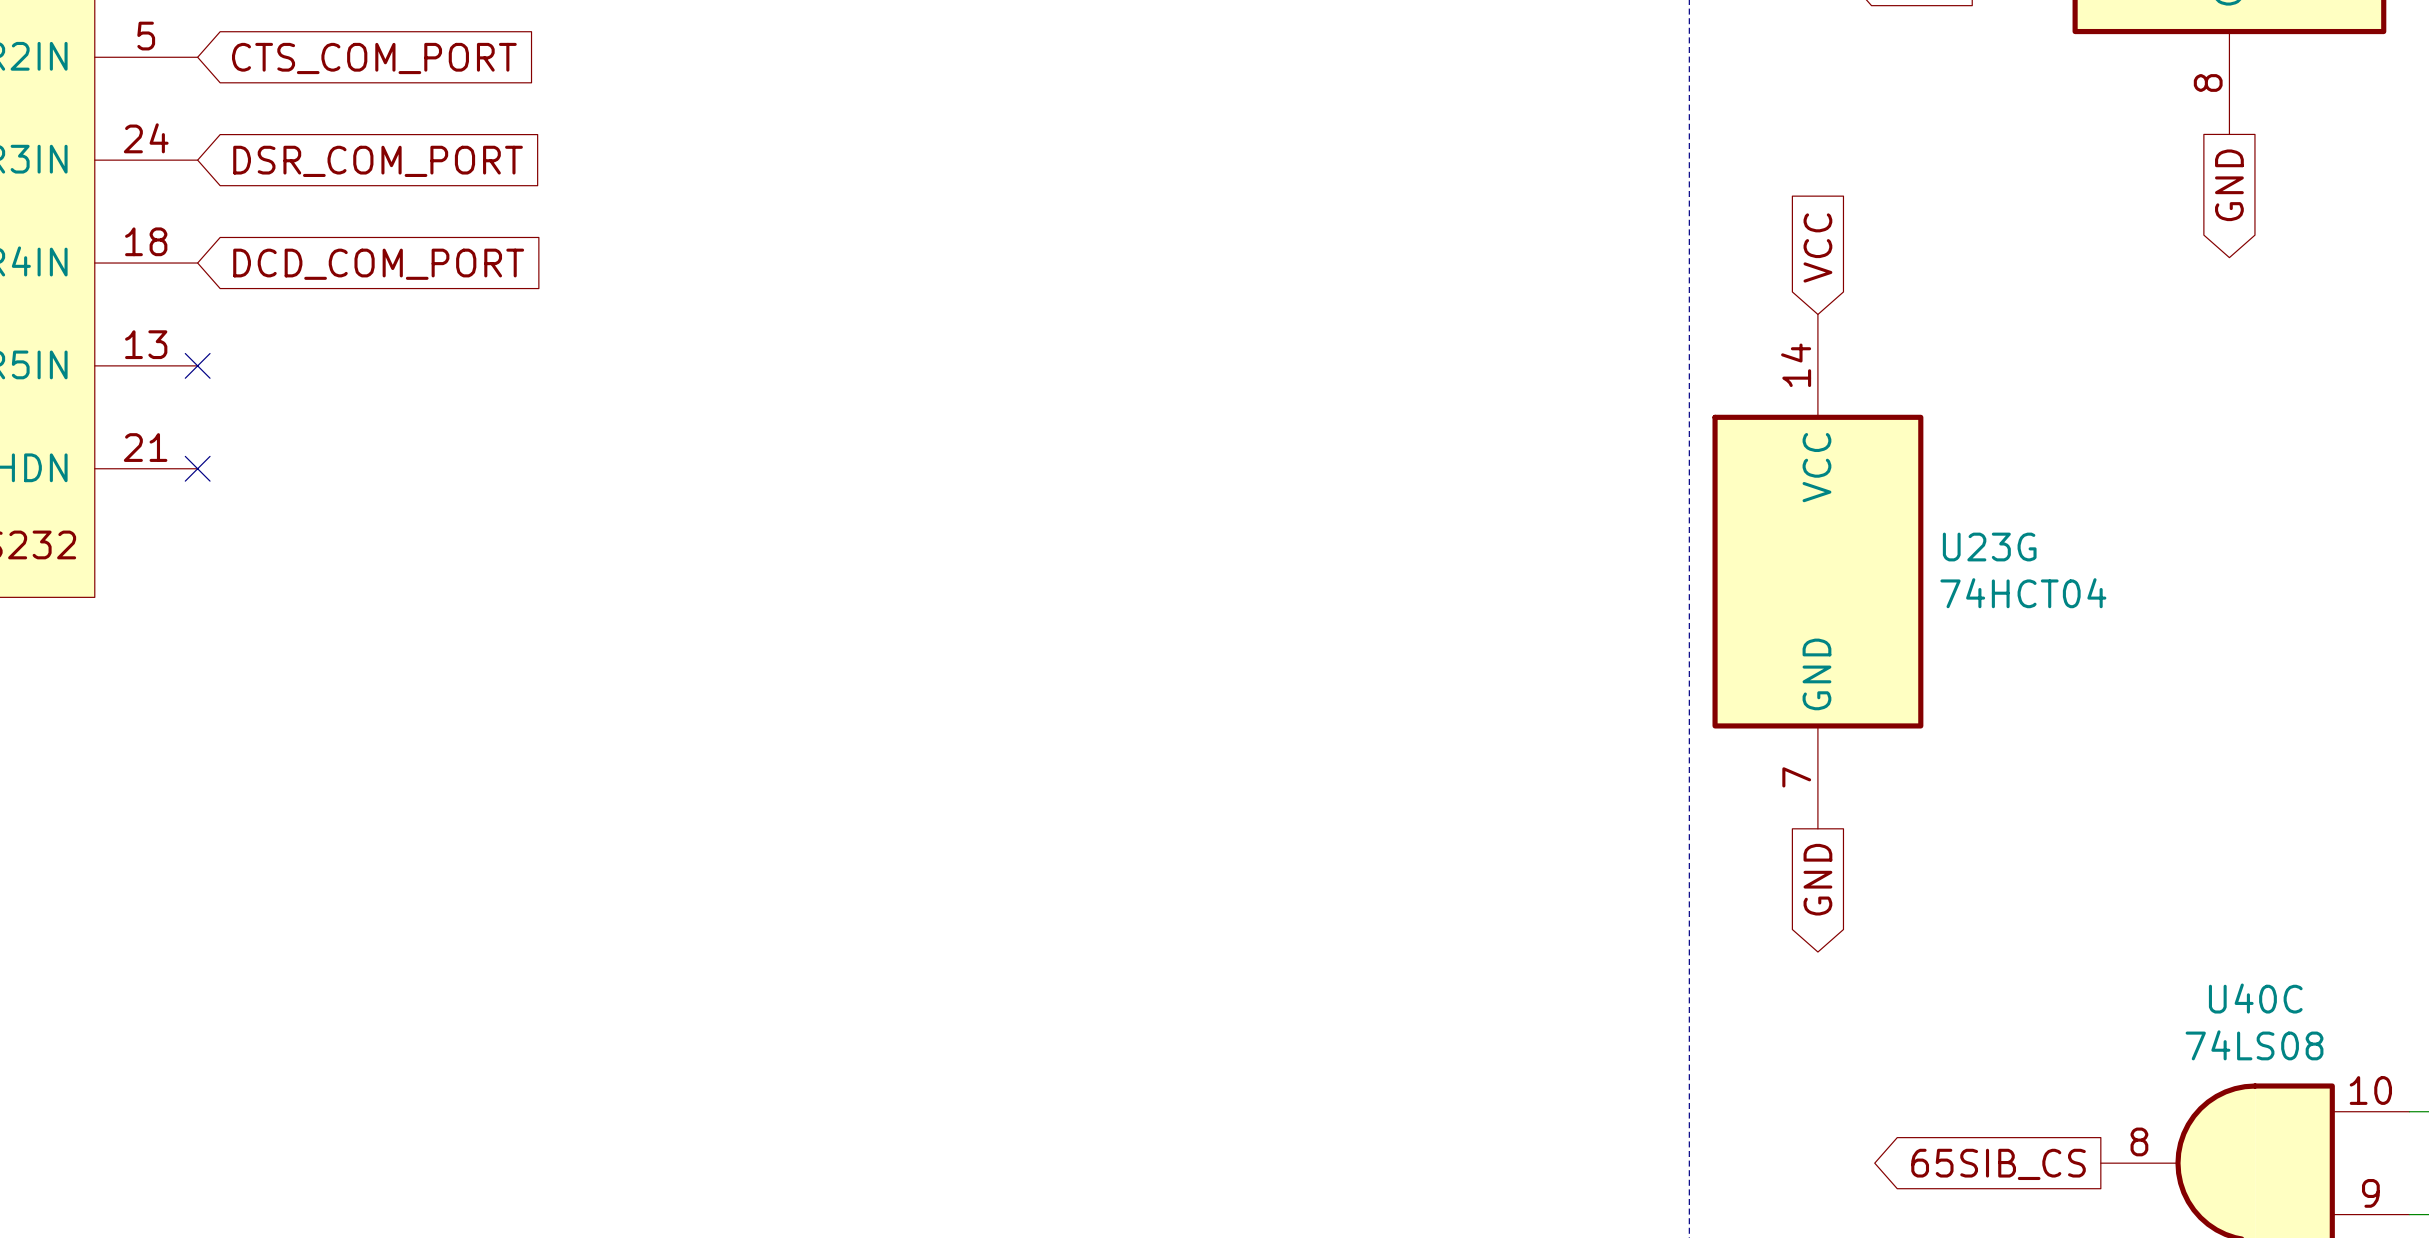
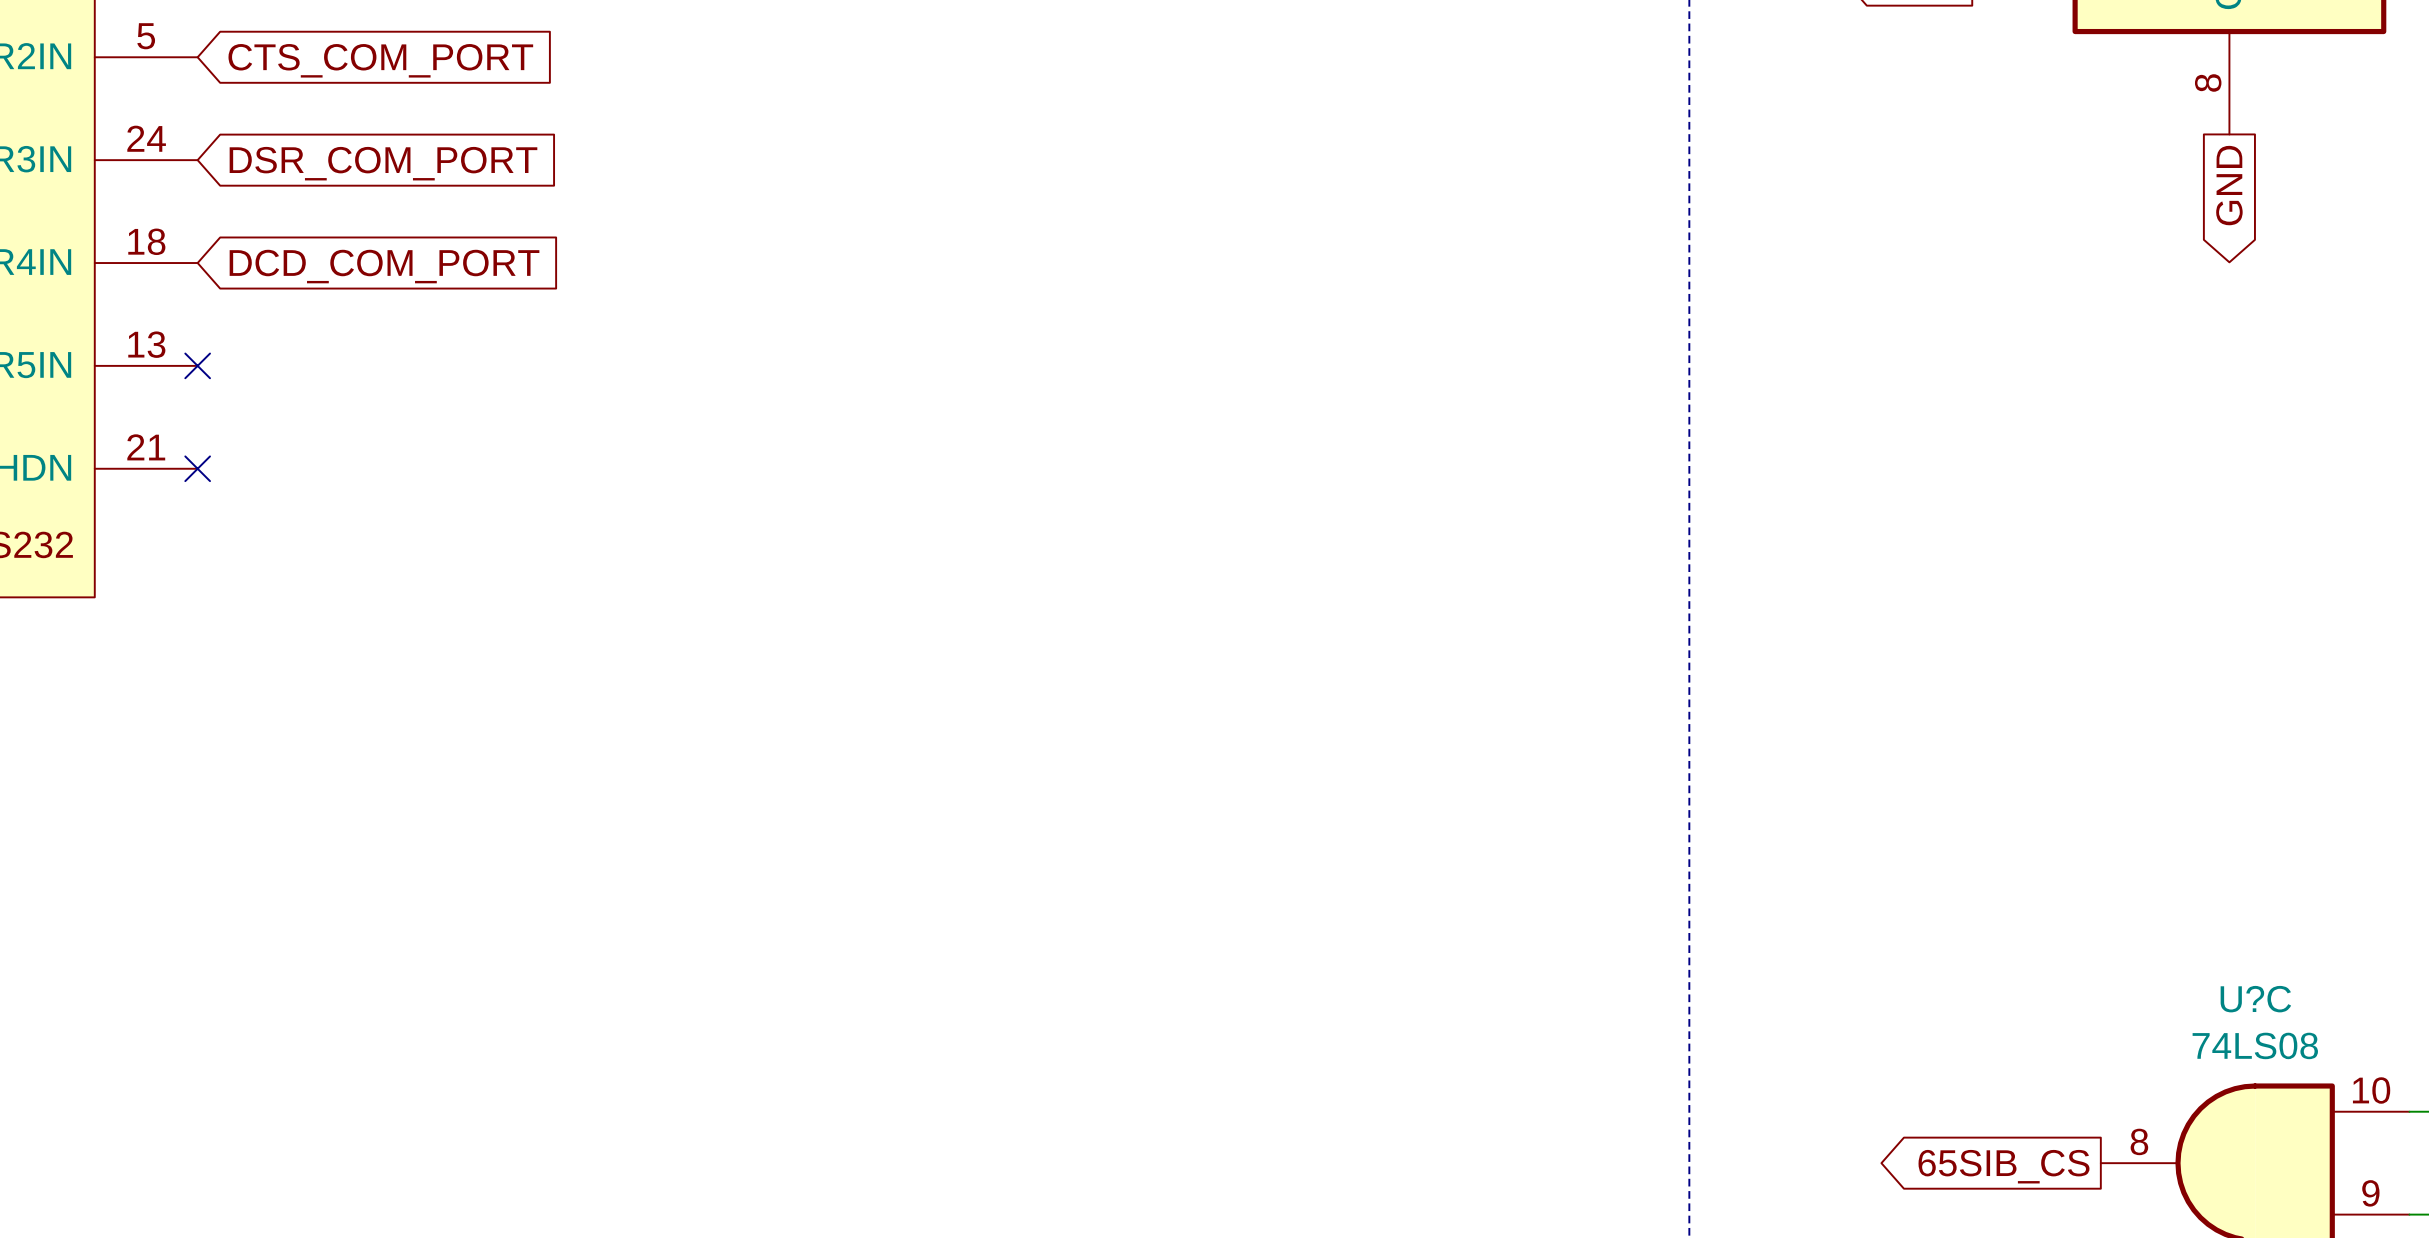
global label: VCC (1817, 247) -> none
U23G: 74HCT04 (1817, 571) -> none
global label: GND (1817, 879) -> none
U40C name: U40C (2255, 998) -> U?C (2255, 999)

